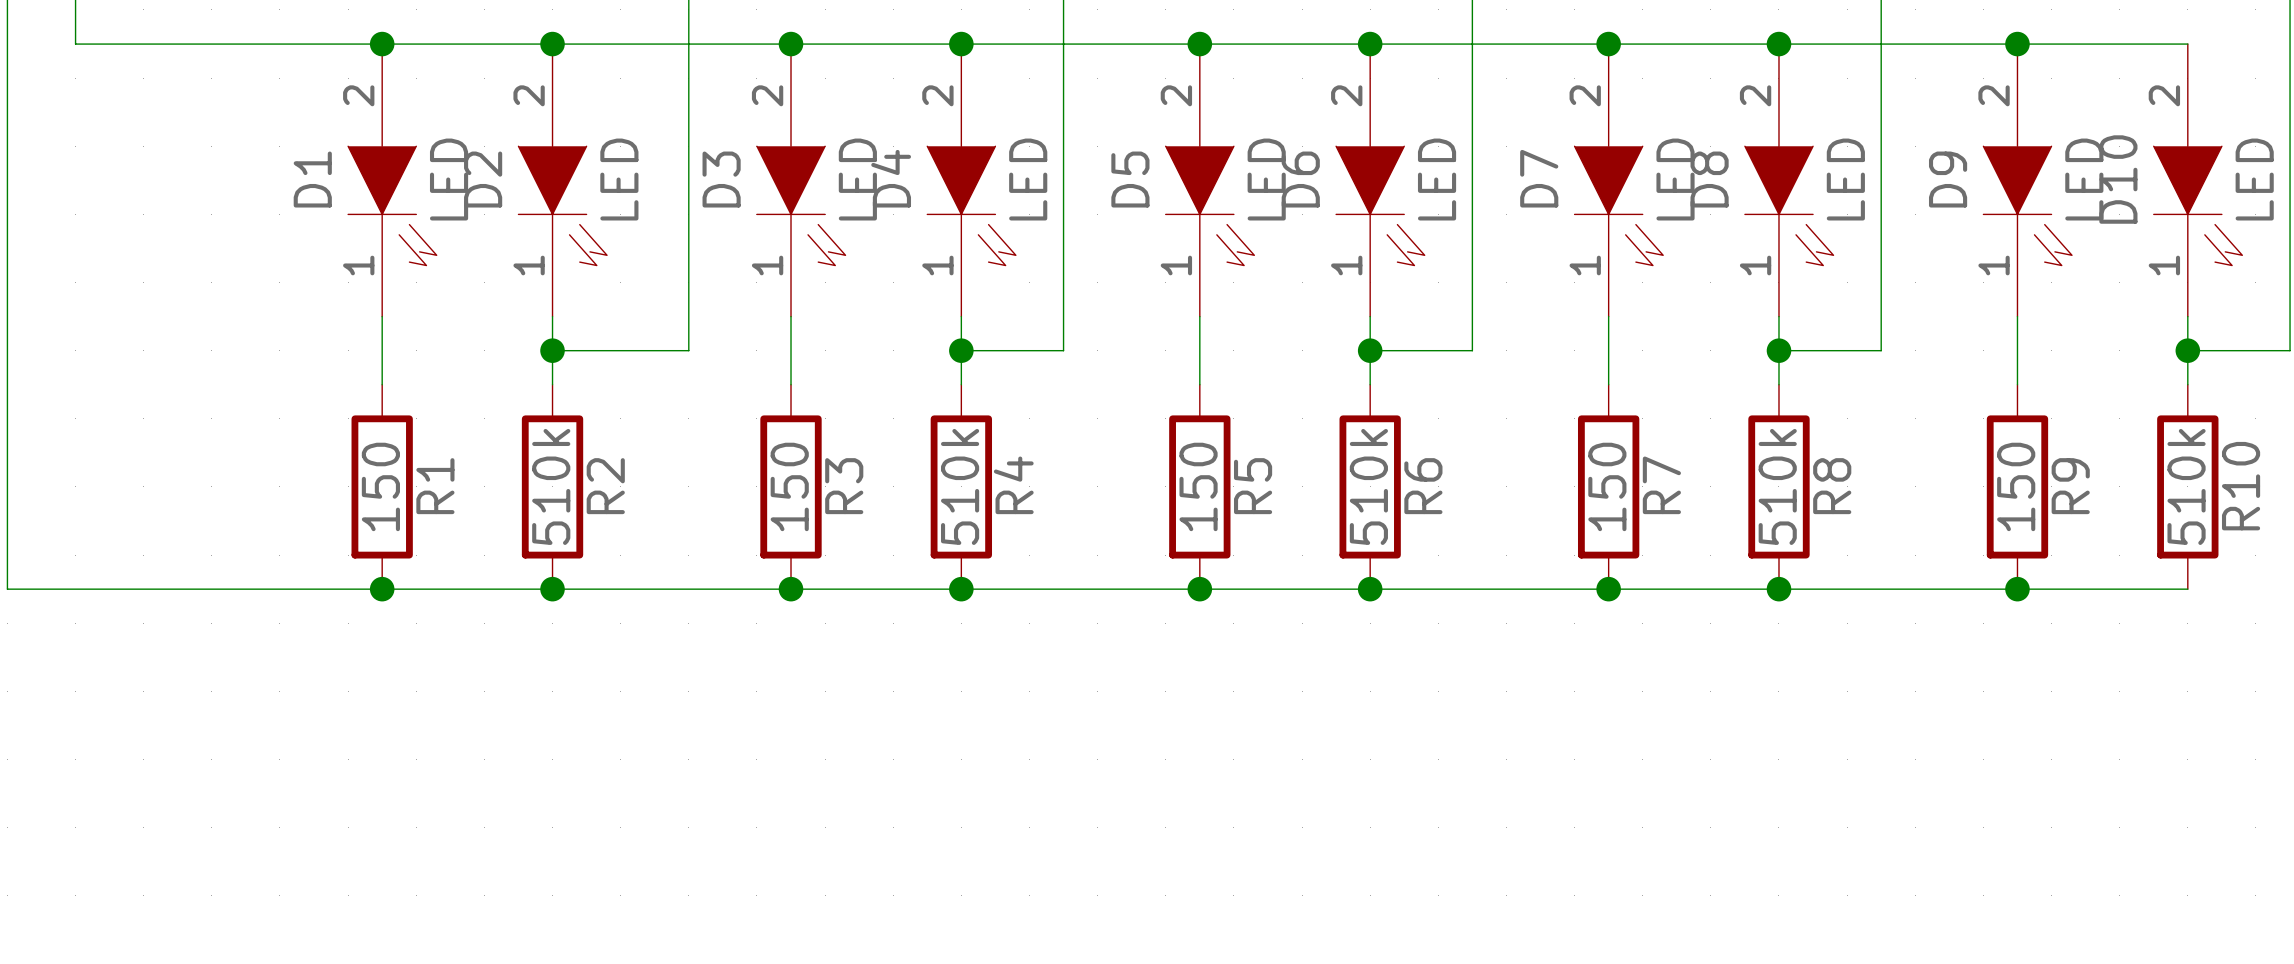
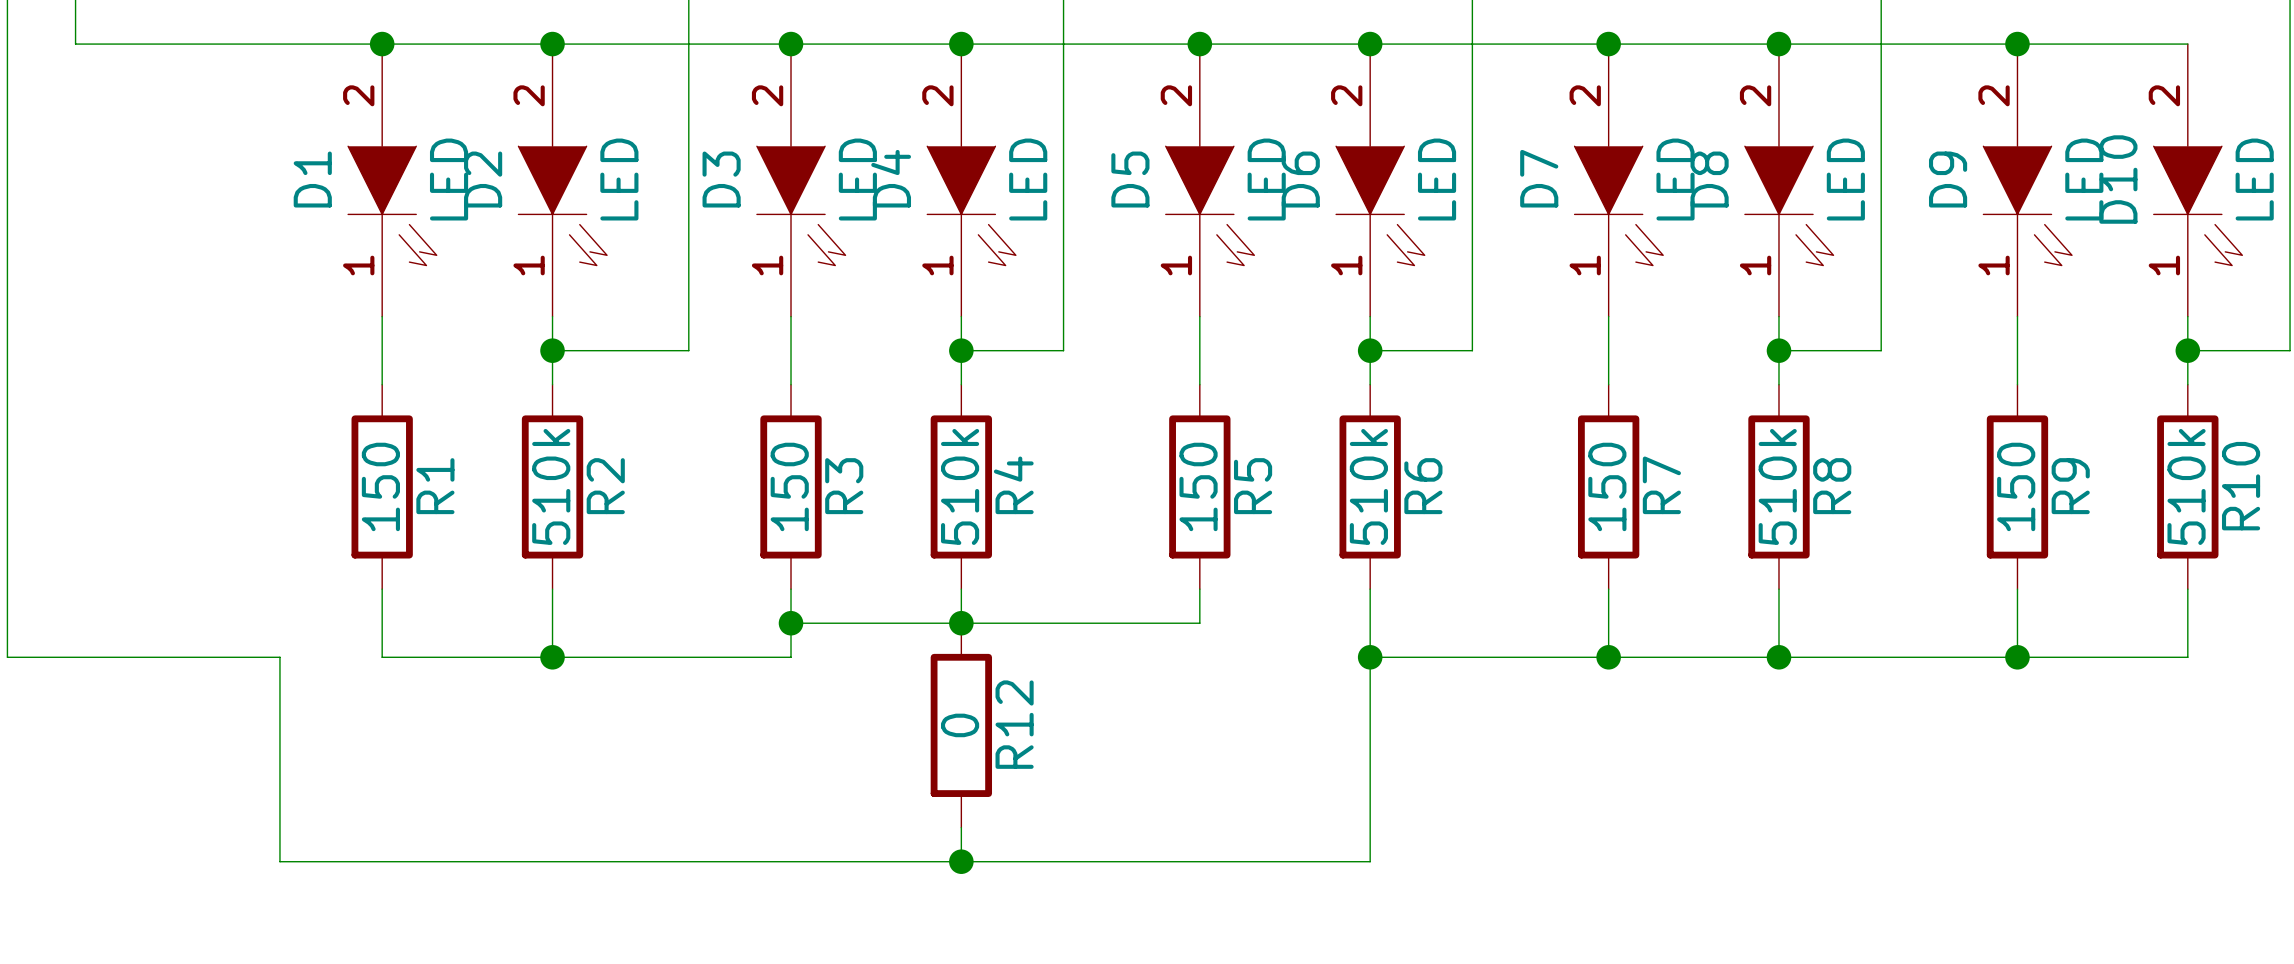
wire: (7, 589) (2187, 589) -> (7, 589) (7, 657) (279, 657) (279, 861) (1370, 861) (1370, 589)
wire: none -> (382, 589) (382, 657) (791, 657) (791, 589)
junction: (382, 589) -> none
wire: none -> (552, 589) (552, 657)
junction position: (552, 589) -> (552, 657)
junction position: (791, 589) -> (791, 623)
wire: none -> (961, 589) (961, 623)
junction position: (961, 589) -> (961, 623)
wire: none -> (1199, 589) (1199, 623) (791, 623)
junction: (1199, 589) -> none
junction position: (1370, 589) -> (1370, 657)
wire: none -> (1608, 589) (1608, 657)
junction position: (1608, 589) -> (1608, 657)
wire: none -> (1778, 589) (1778, 657)
junction position: (1778, 589) -> (1778, 657)
wire: none -> (2017, 589) (2017, 657)
junction position: (2017, 589) -> (2017, 657)
wire: none -> (2187, 589) (2187, 657) (1370, 657)
R12: none -> 0 (961, 725)
wire: none -> (961, 827) (961, 861)
junction: none -> (961, 861)

